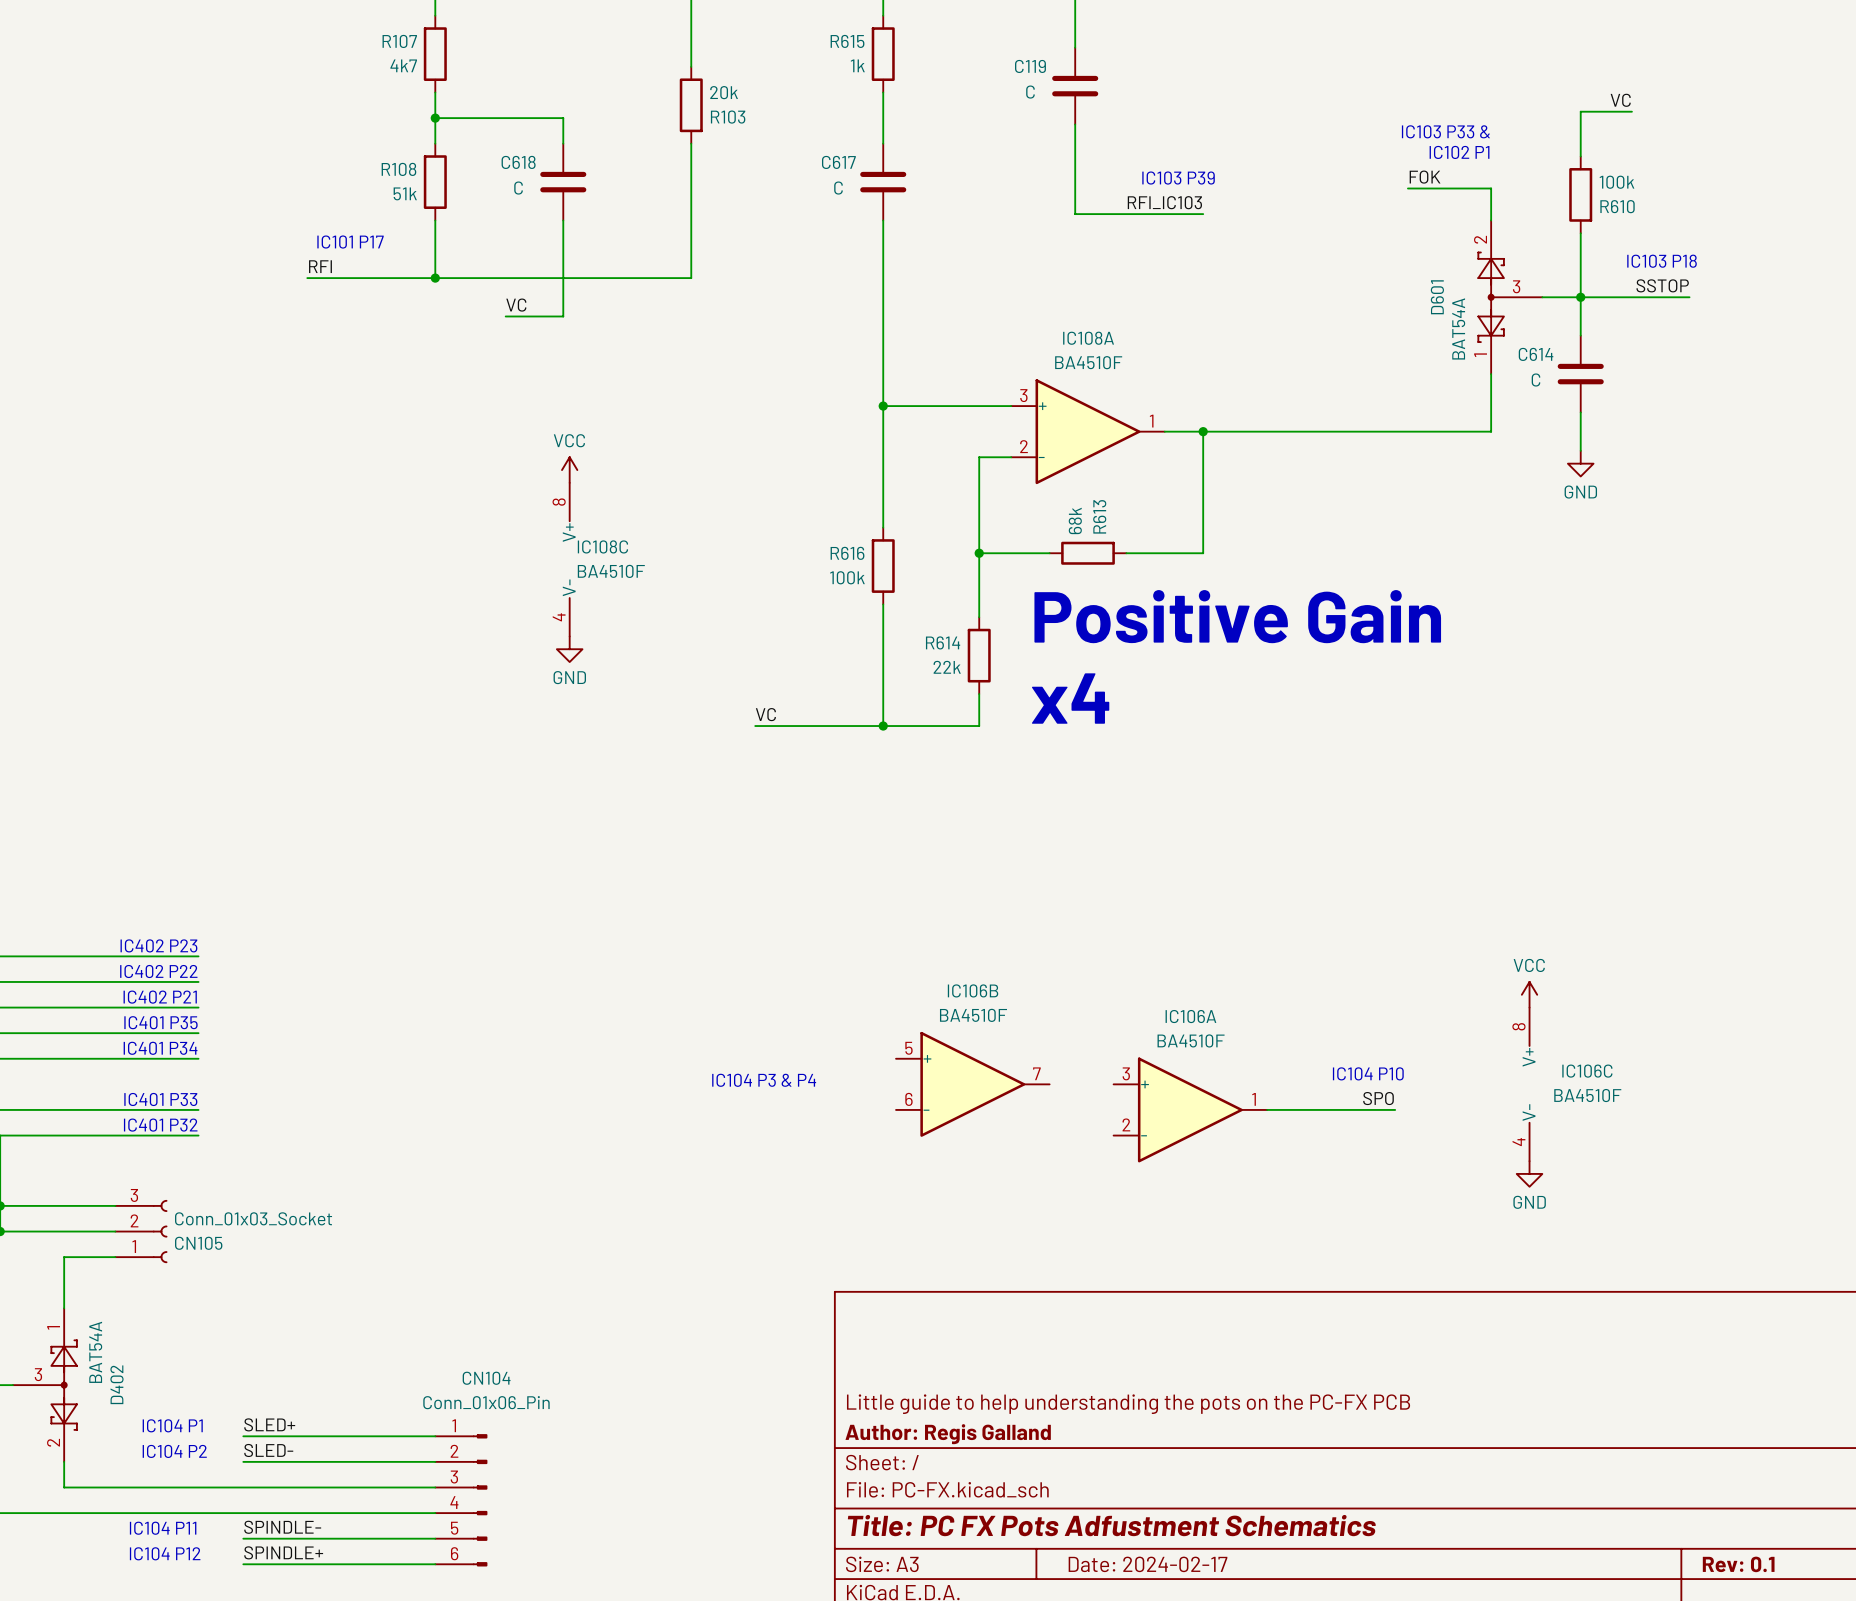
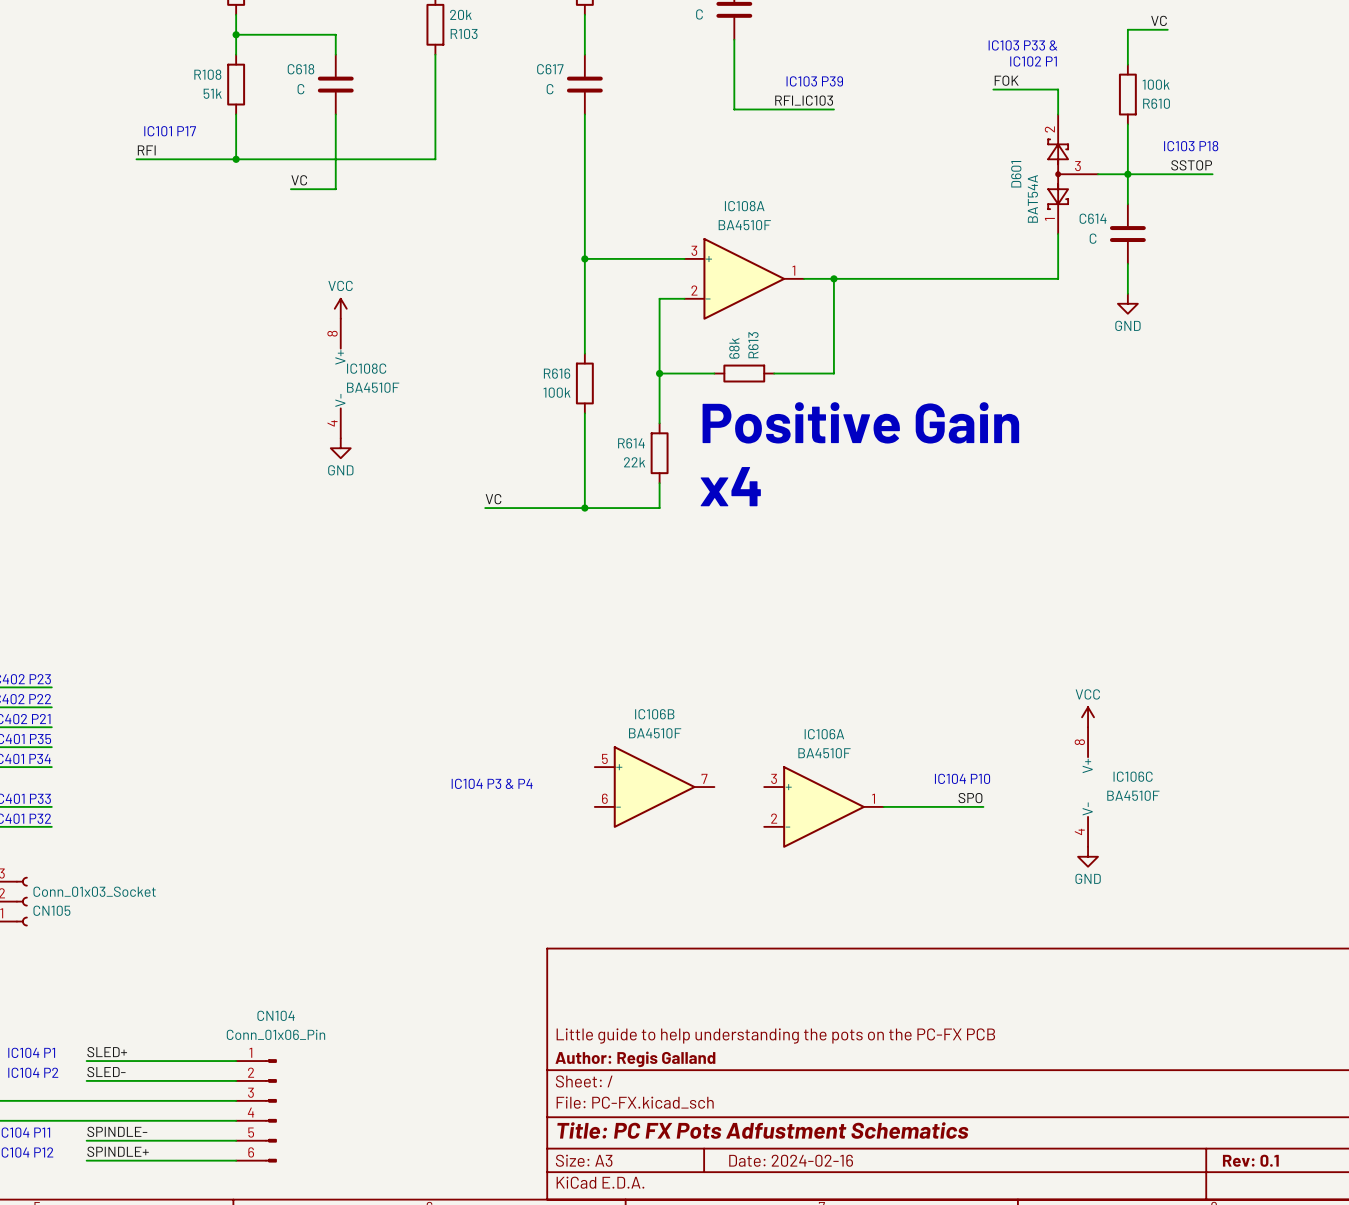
title block: Date: 2024-02-17 (1148, 1564) -> Date: 2024-02-16 (791, 1160)

